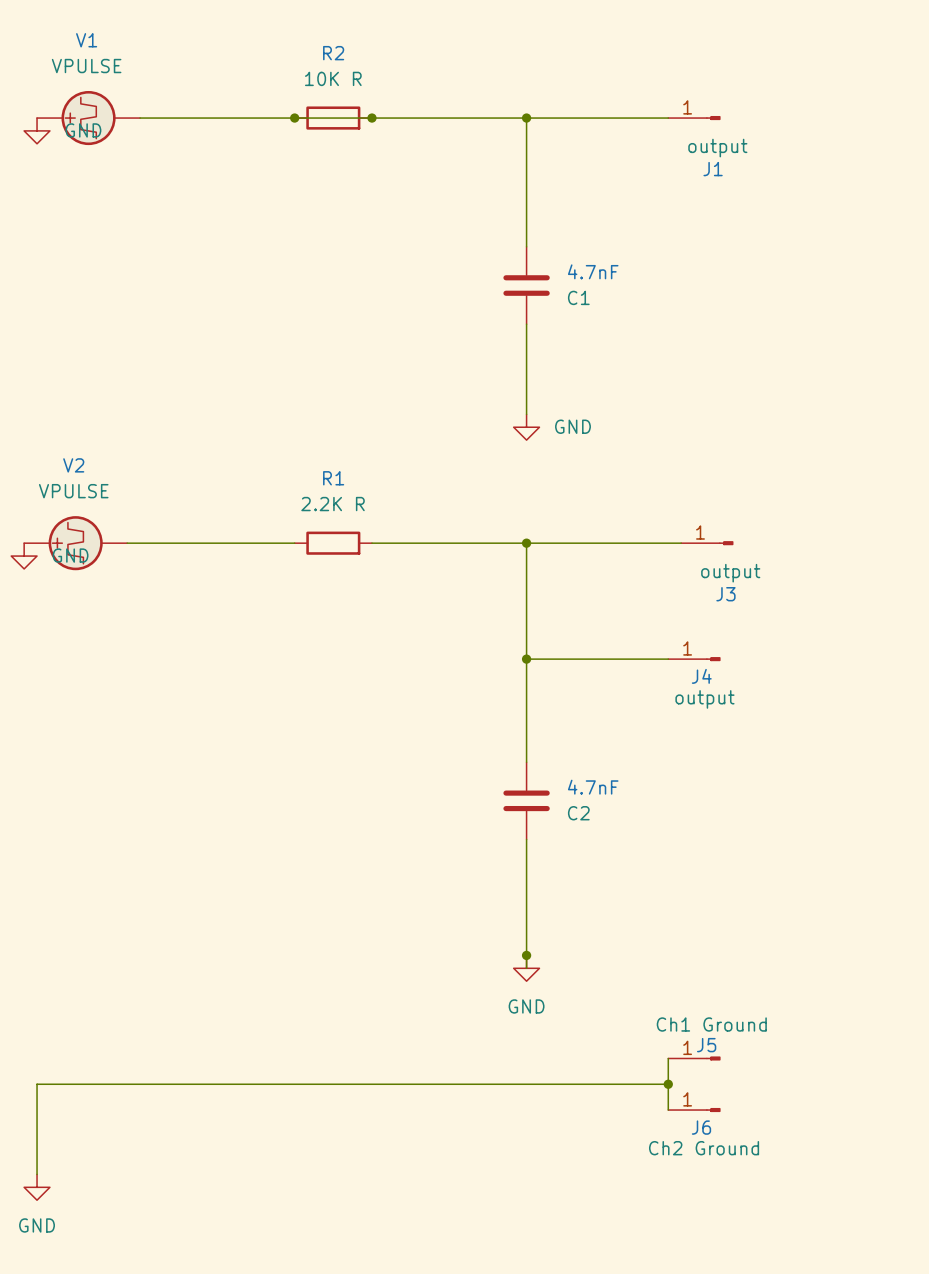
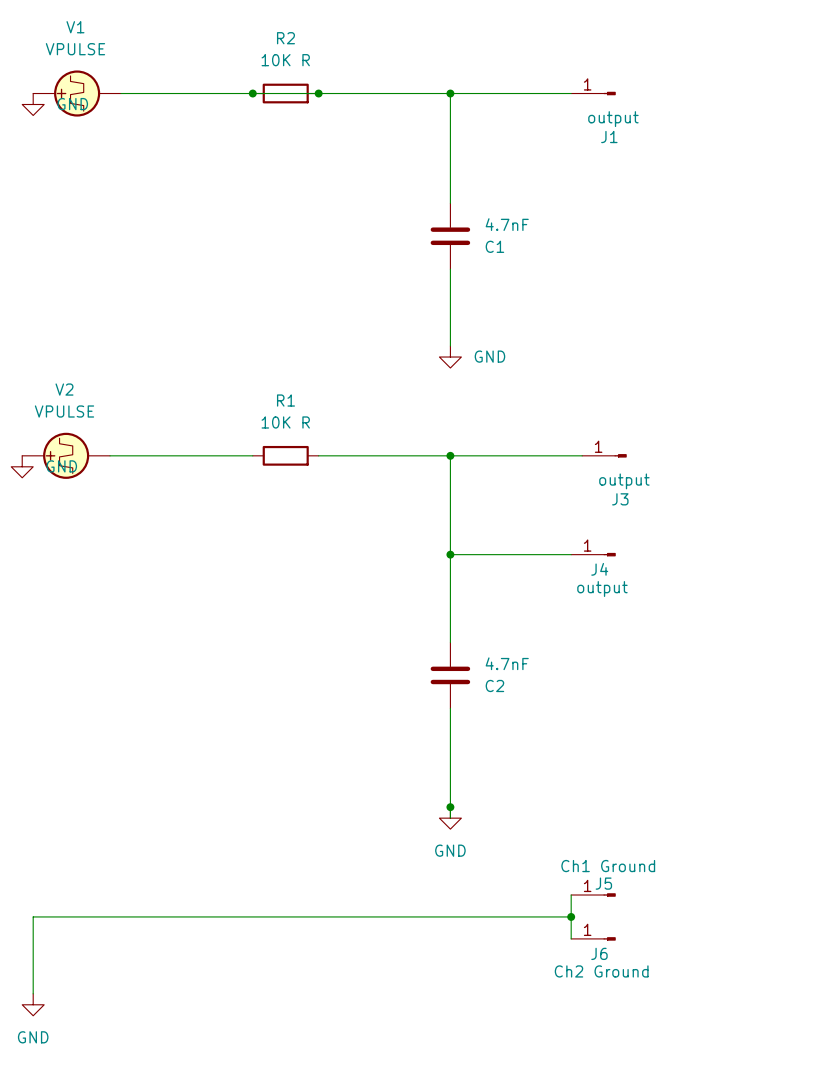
R1 value: 2.2K R (333, 504) -> 10K R (285, 422)

